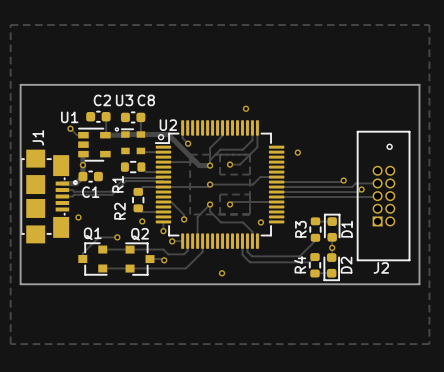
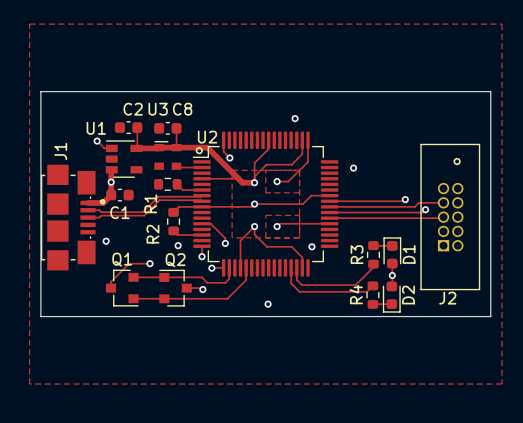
drawing: [114, 127, 120, 132] -> none

